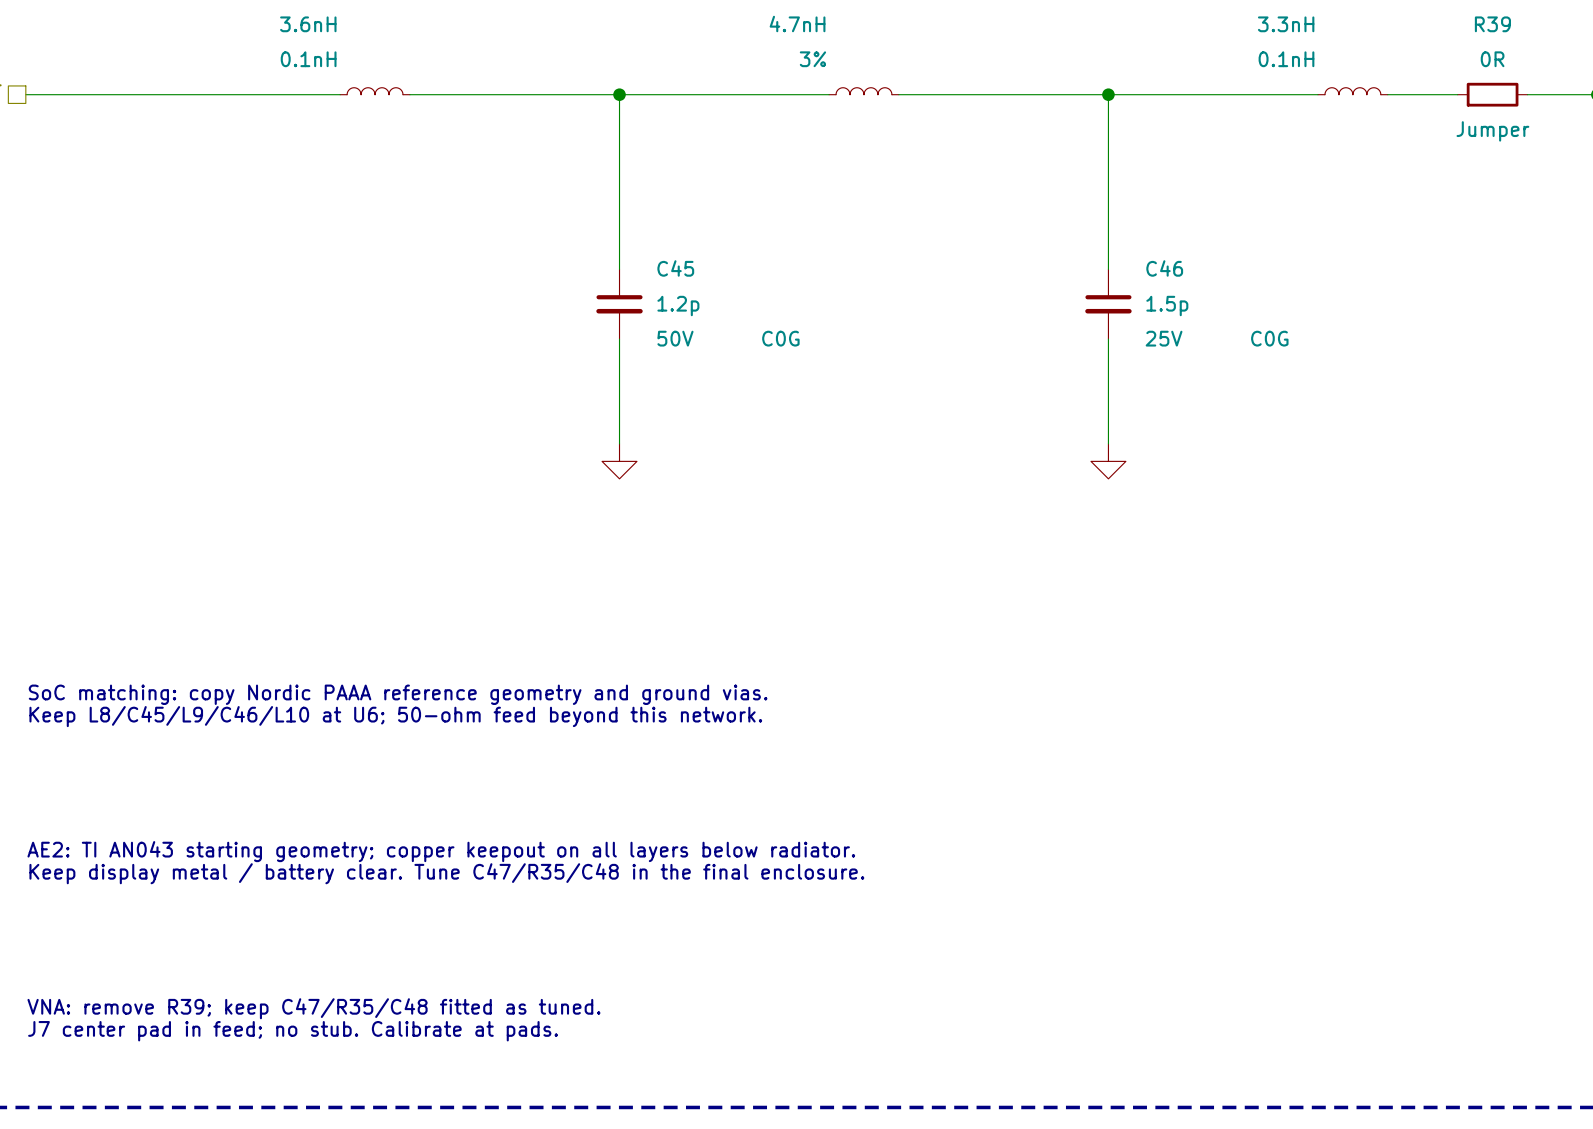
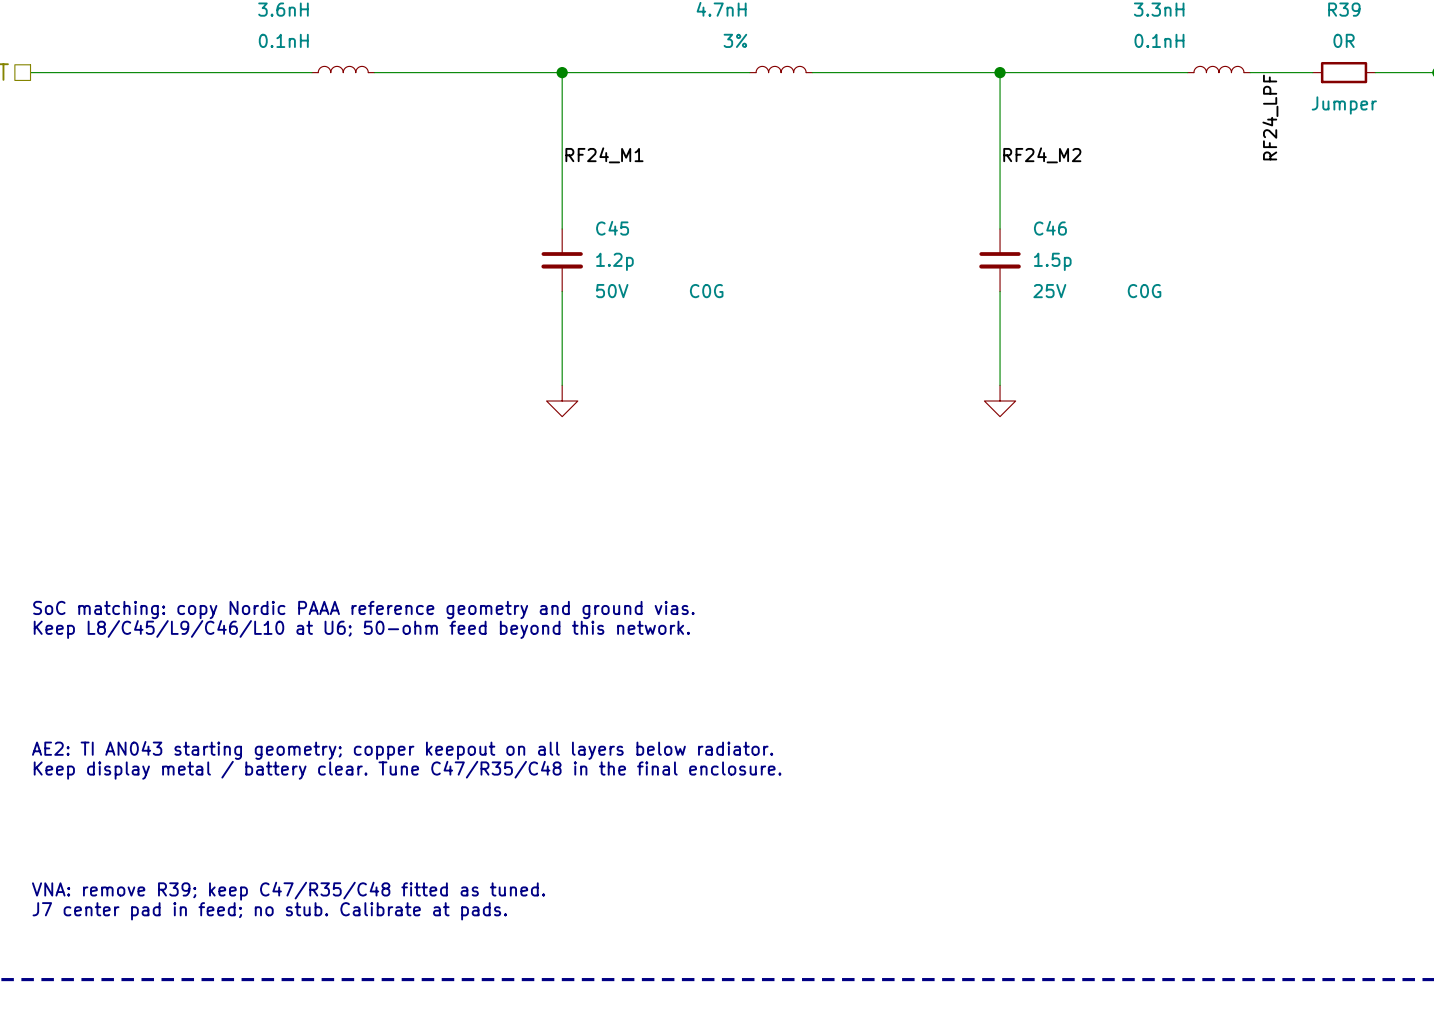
label: none -> RF24_LPF (1270, 117)
label: none -> RF24_M1 (604, 155)
label: none -> RF24_M2 (1042, 155)

